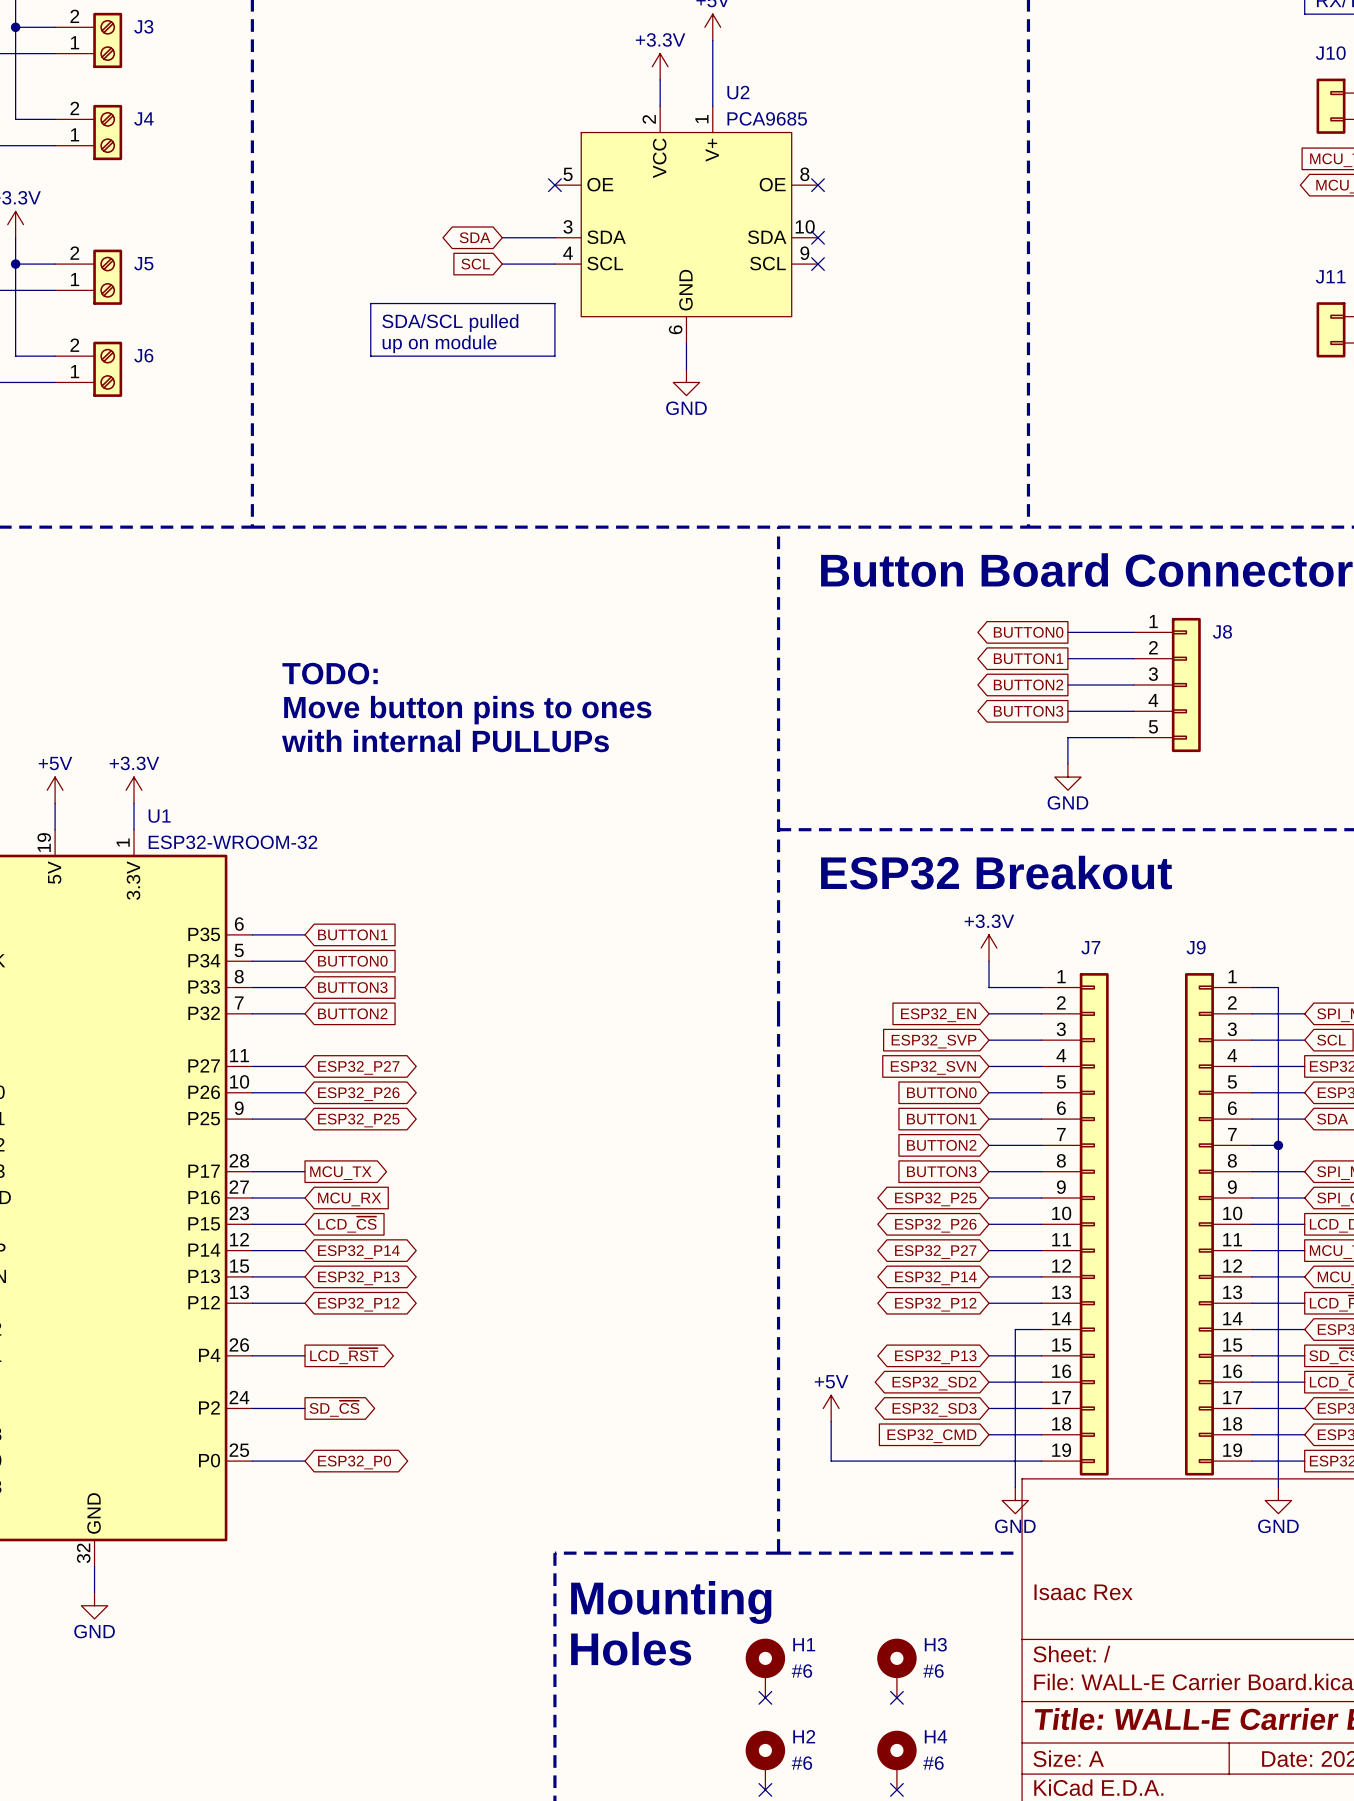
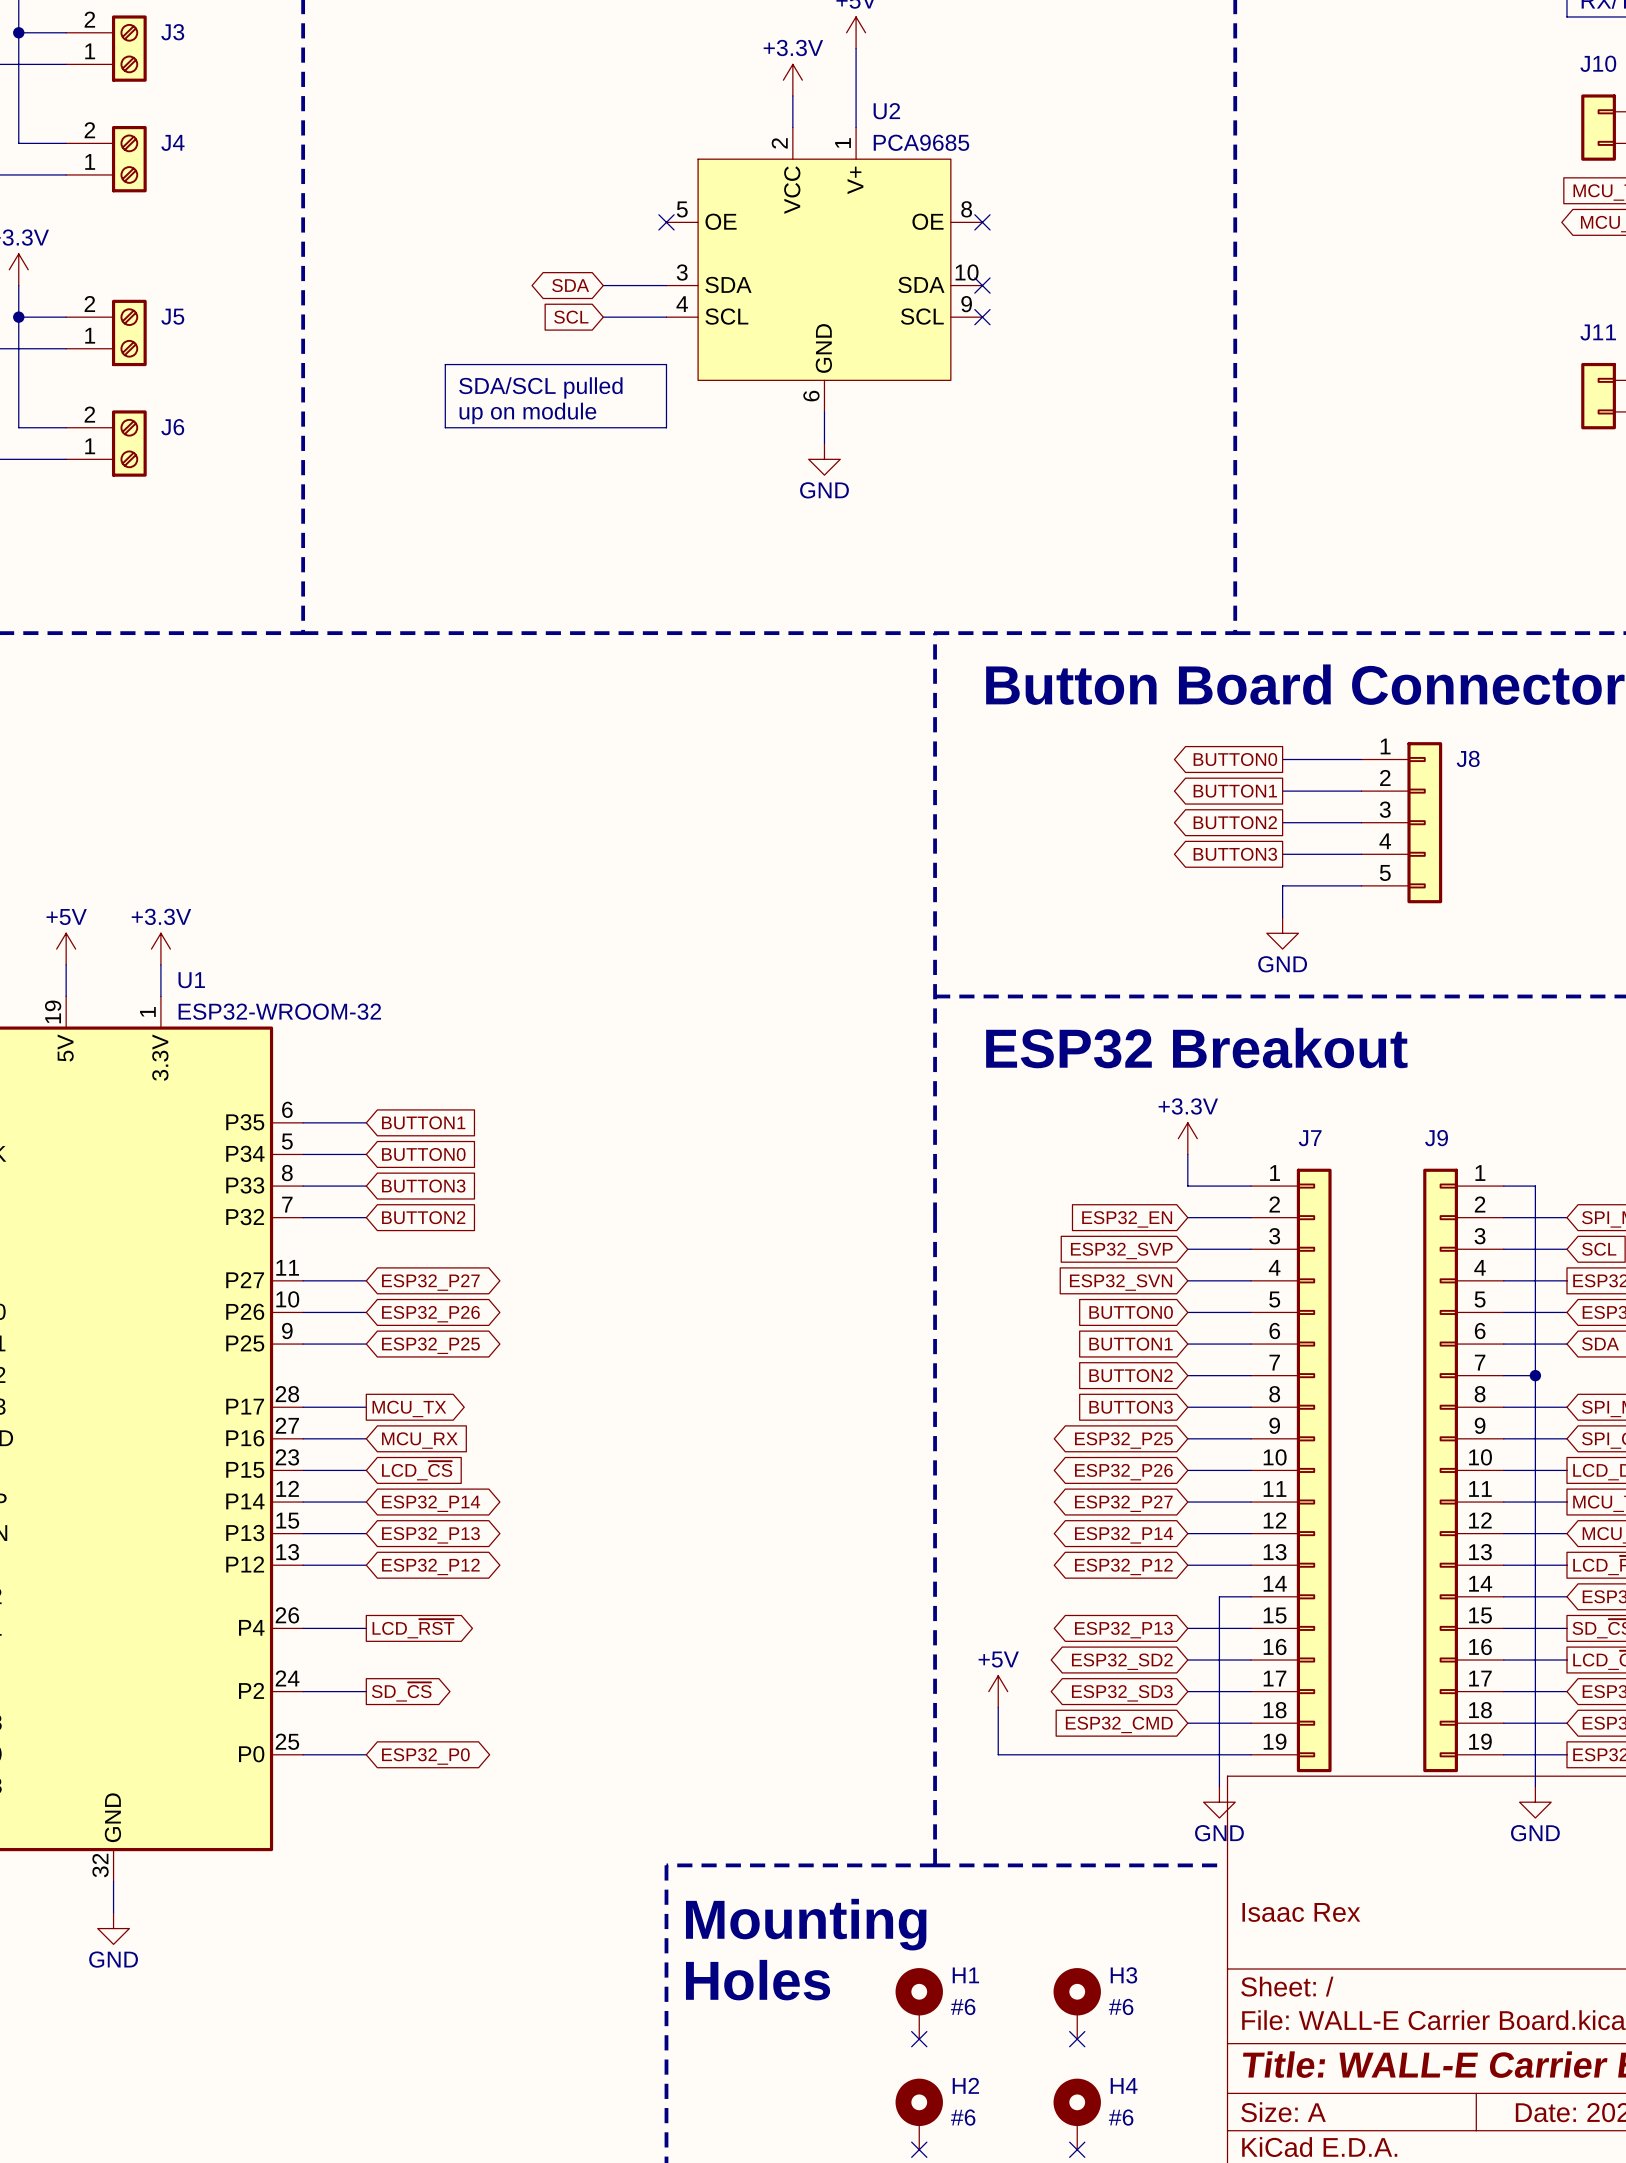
text: TODO: (330, 673) -> none
text: Move button pins to ones (467, 710) -> none
text: with internal PULLUPs (445, 740) -> none

